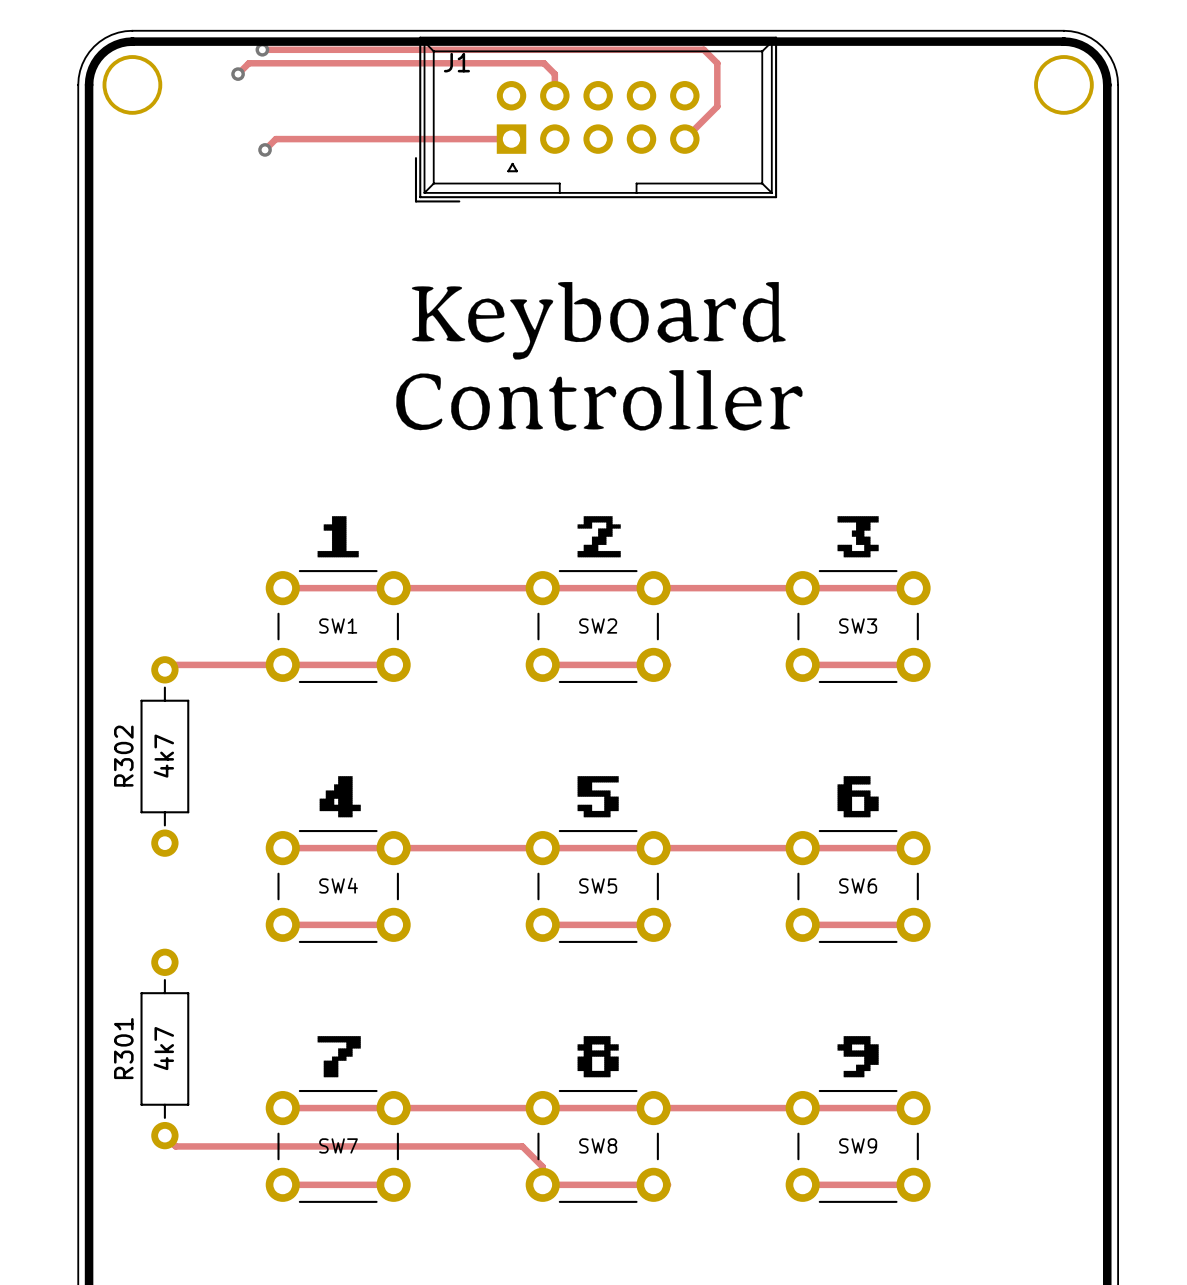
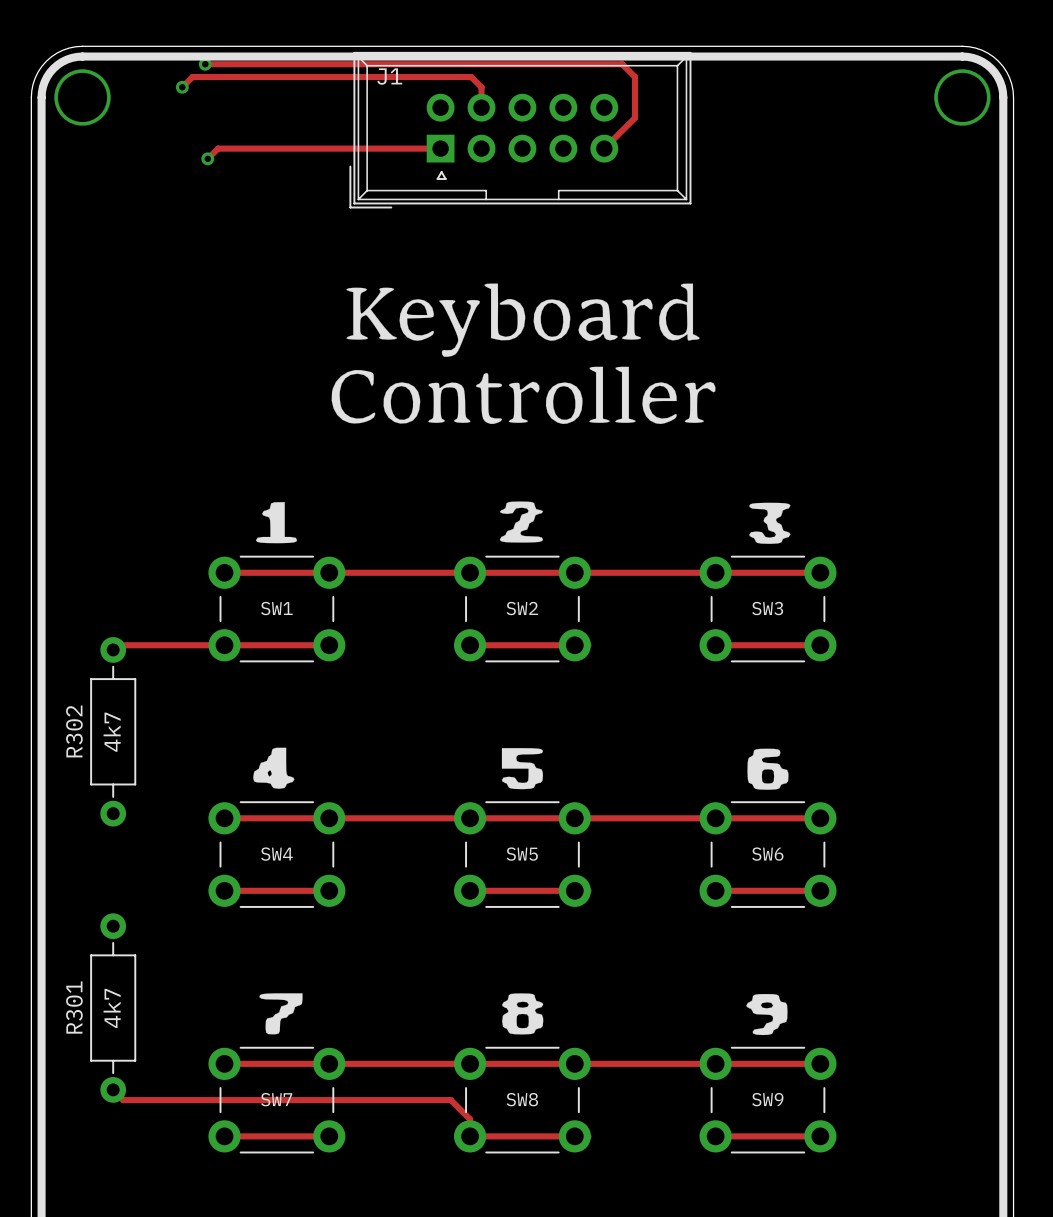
drawing shape: [317, 516, 359, 558] -> [256, 502, 298, 544]
drawing shape: [577, 516, 621, 558] -> [499, 501, 543, 543]
drawing shape: [837, 516, 879, 558] -> [749, 502, 791, 544]
drawing shape: [319, 776, 361, 818] -> [253, 747, 295, 789]
drawing shape: [577, 776, 619, 818] -> [501, 748, 543, 790]
drawing shape: [837, 776, 879, 818] -> [747, 748, 789, 790]
drawing shape: [317, 1036, 361, 1078] -> [259, 993, 303, 1035]
drawing shape: [577, 1036, 619, 1078] -> [502, 993, 544, 1035]
drawing shape: [837, 1036, 879, 1078] -> [746, 993, 788, 1036]

